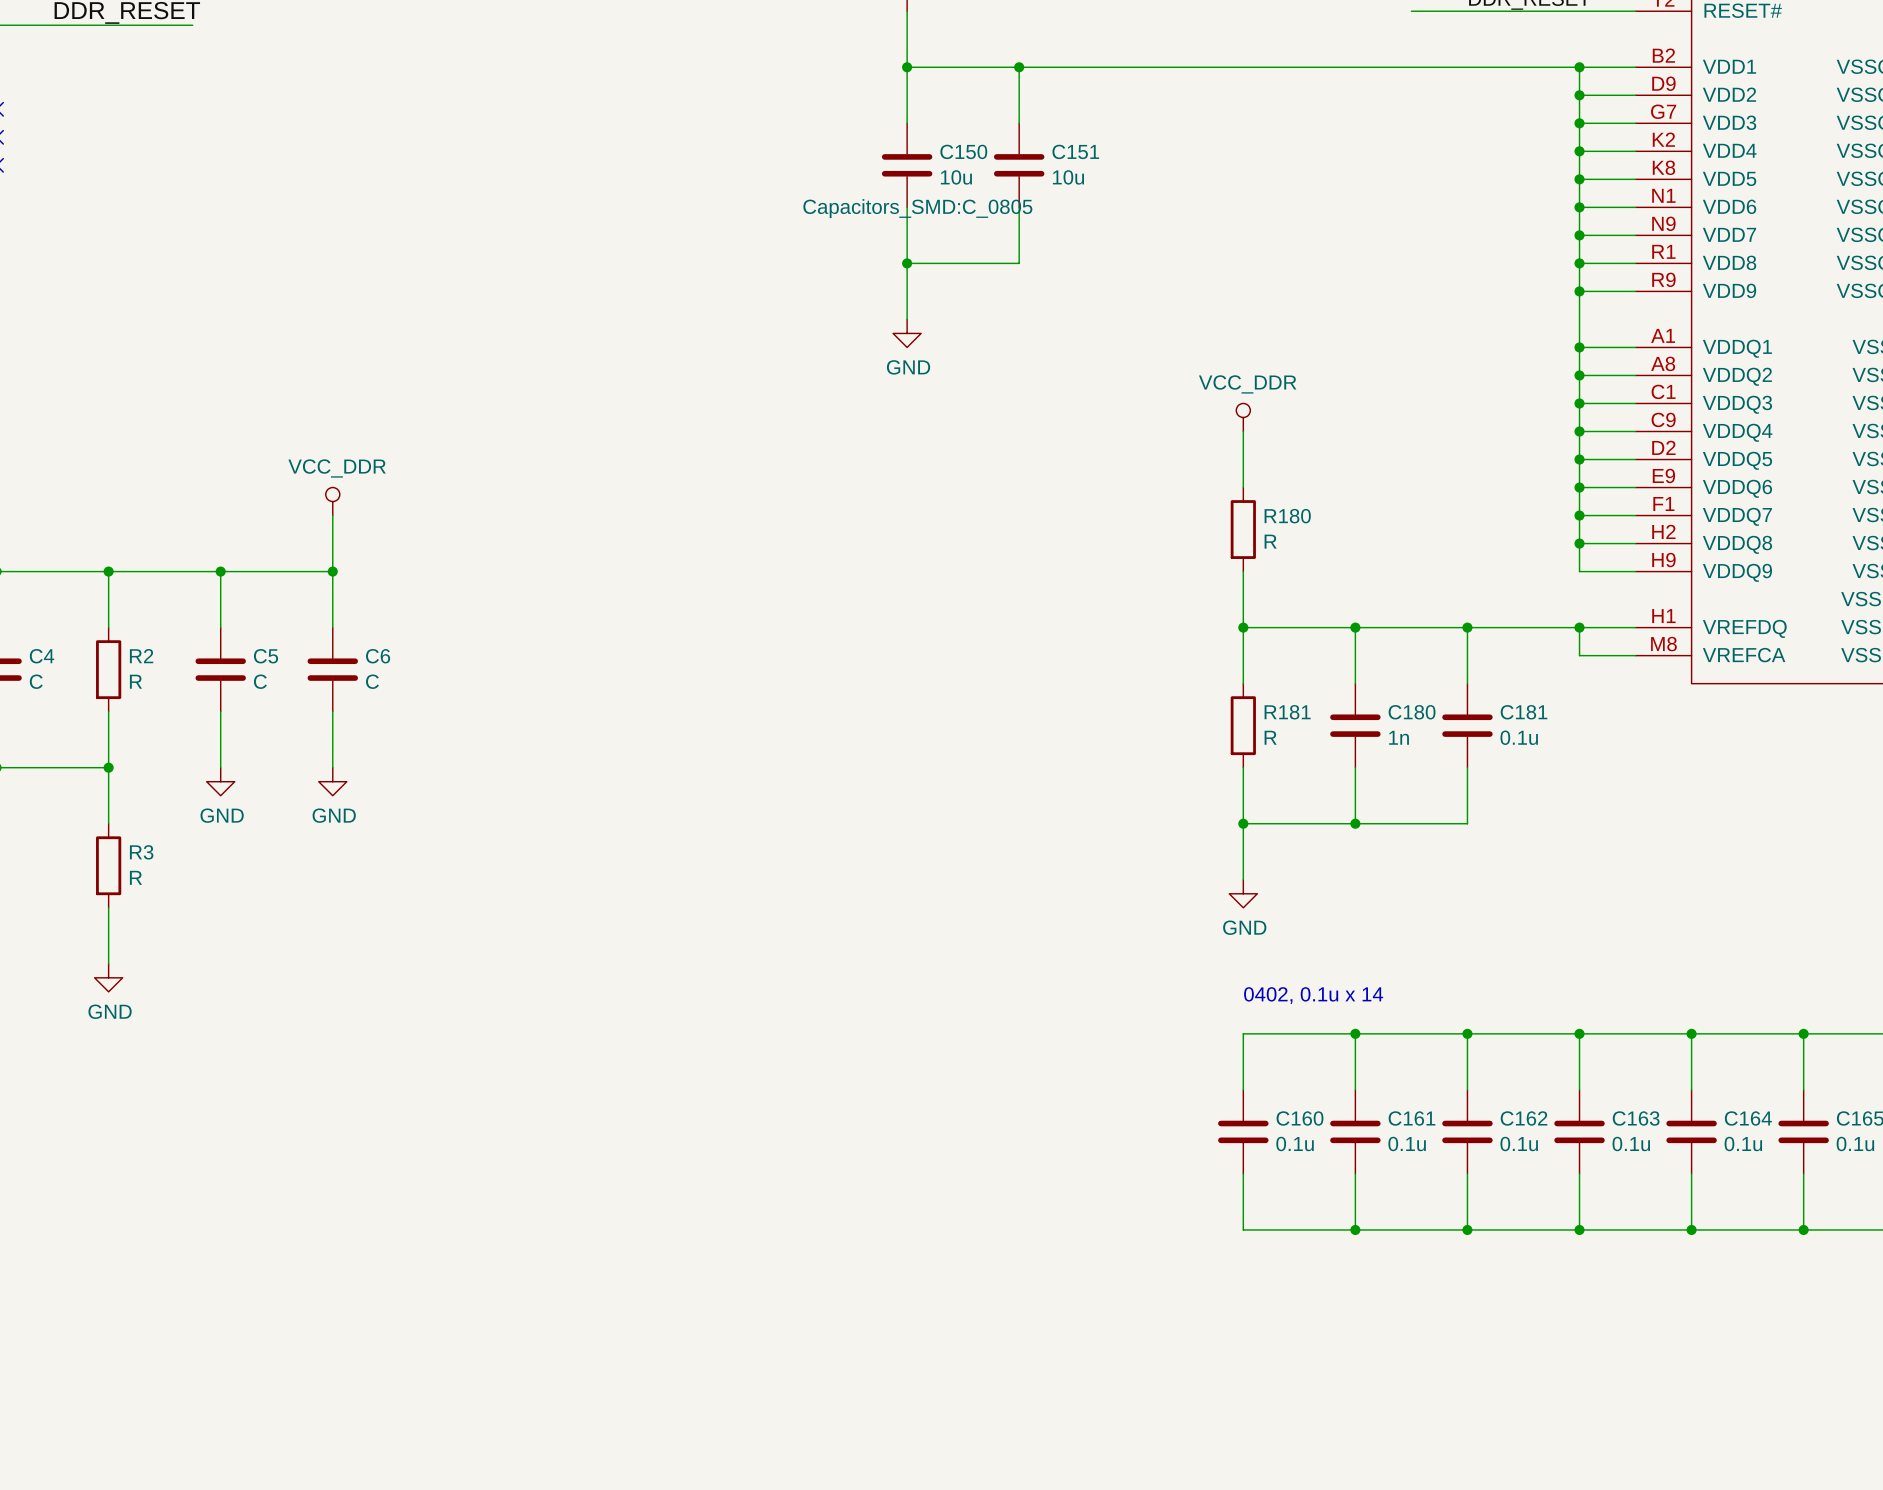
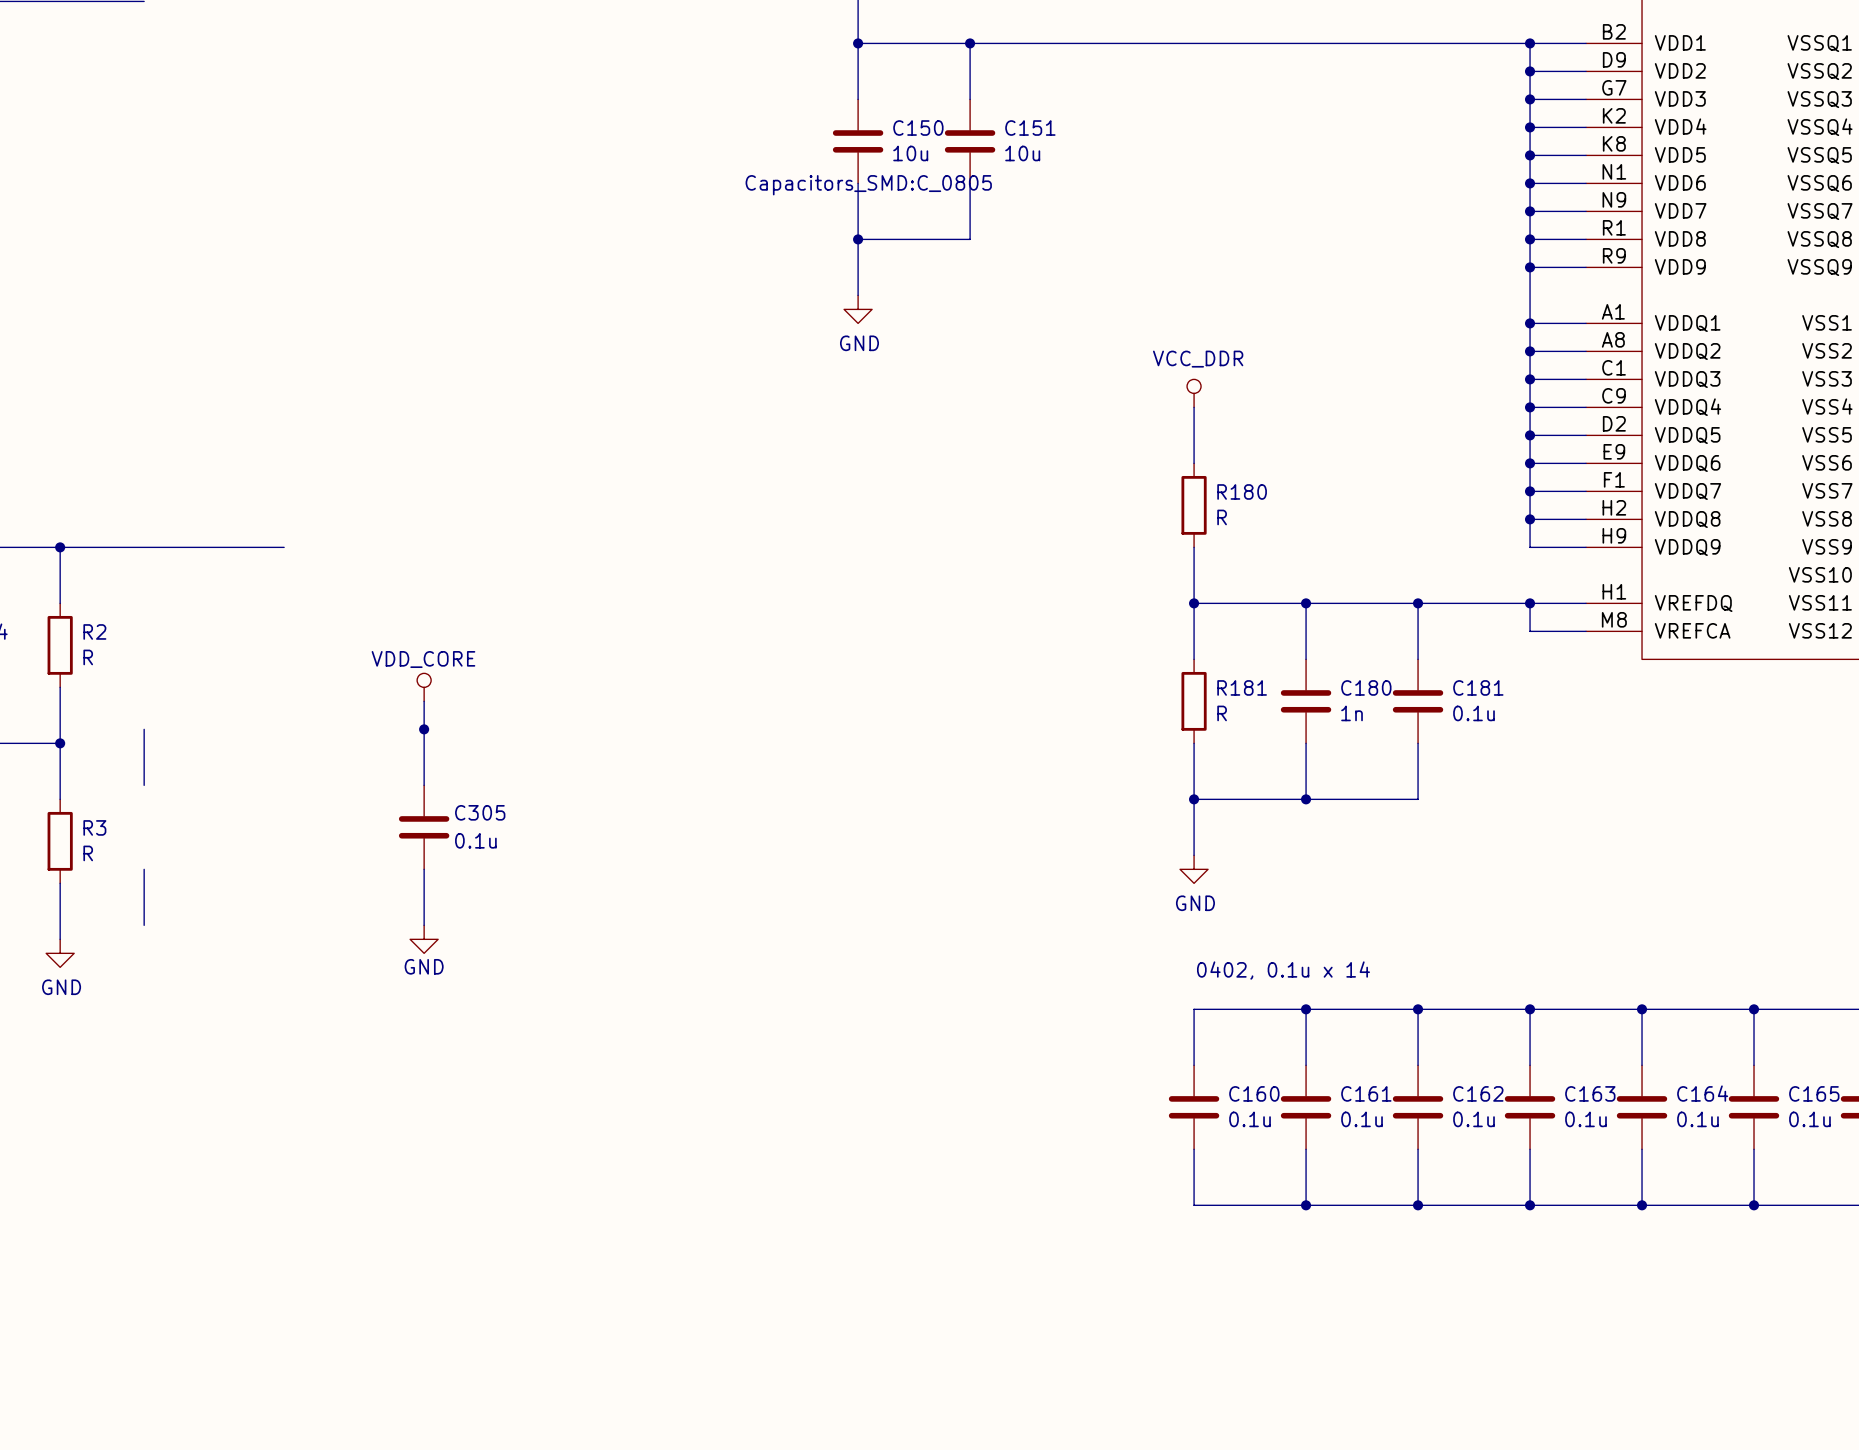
power symbol: VCC_DDR (332, 501) -> none
wire: (332, 515) (332, 627) -> none
wire: (220, 571) (220, 627) -> (144, 729) (144, 785)
junction: (220, 571) -> none
junction: (332, 571) -> none
C5: C (220, 669) -> none
C6: C (332, 669) -> none
wire: (220, 711) (220, 767) -> (144, 869) (144, 925)
wire: (332, 711) (332, 767) -> (424, 869) (424, 925)
power symbol: none -> VDD_CORE (424, 687)
wire: none -> (424, 701) (424, 785)
junction: none -> (424, 729)
power symbol: GND (220, 781) -> none
power symbol: GND (332, 781) -> none
C305: none -> 0.1u (424, 827)
power symbol: none -> GND (424, 939)

